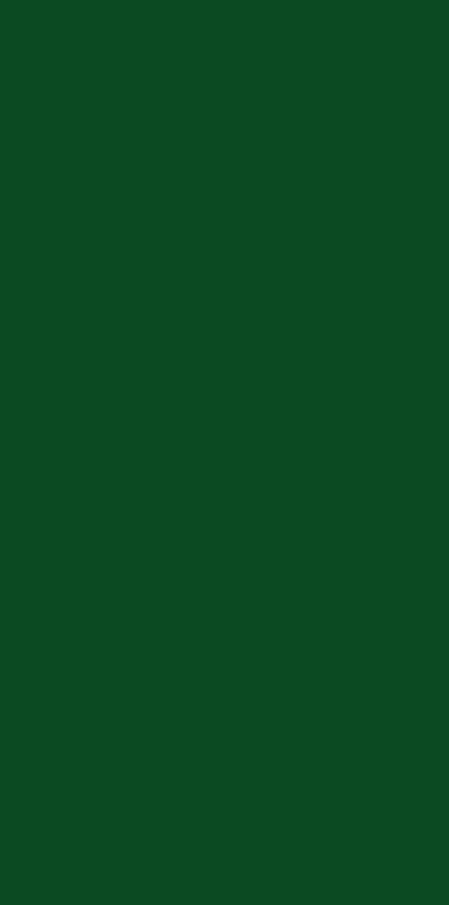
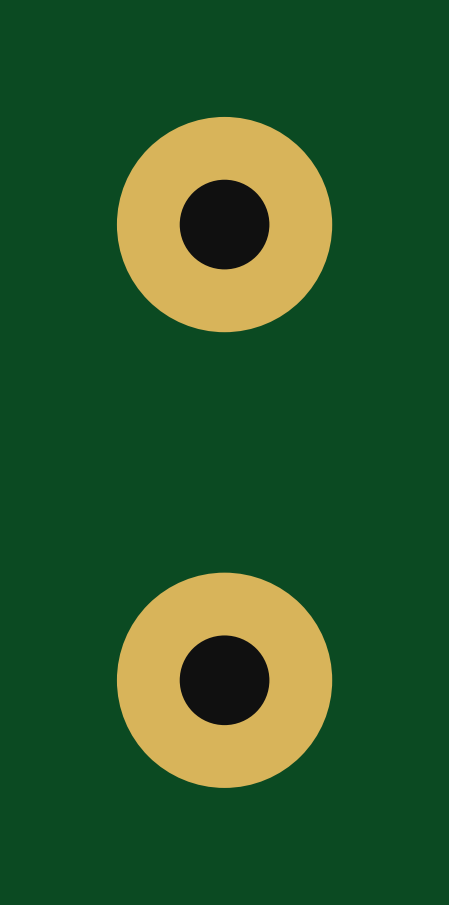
part: none -> (224, 224)
part: none -> (224, 680)

